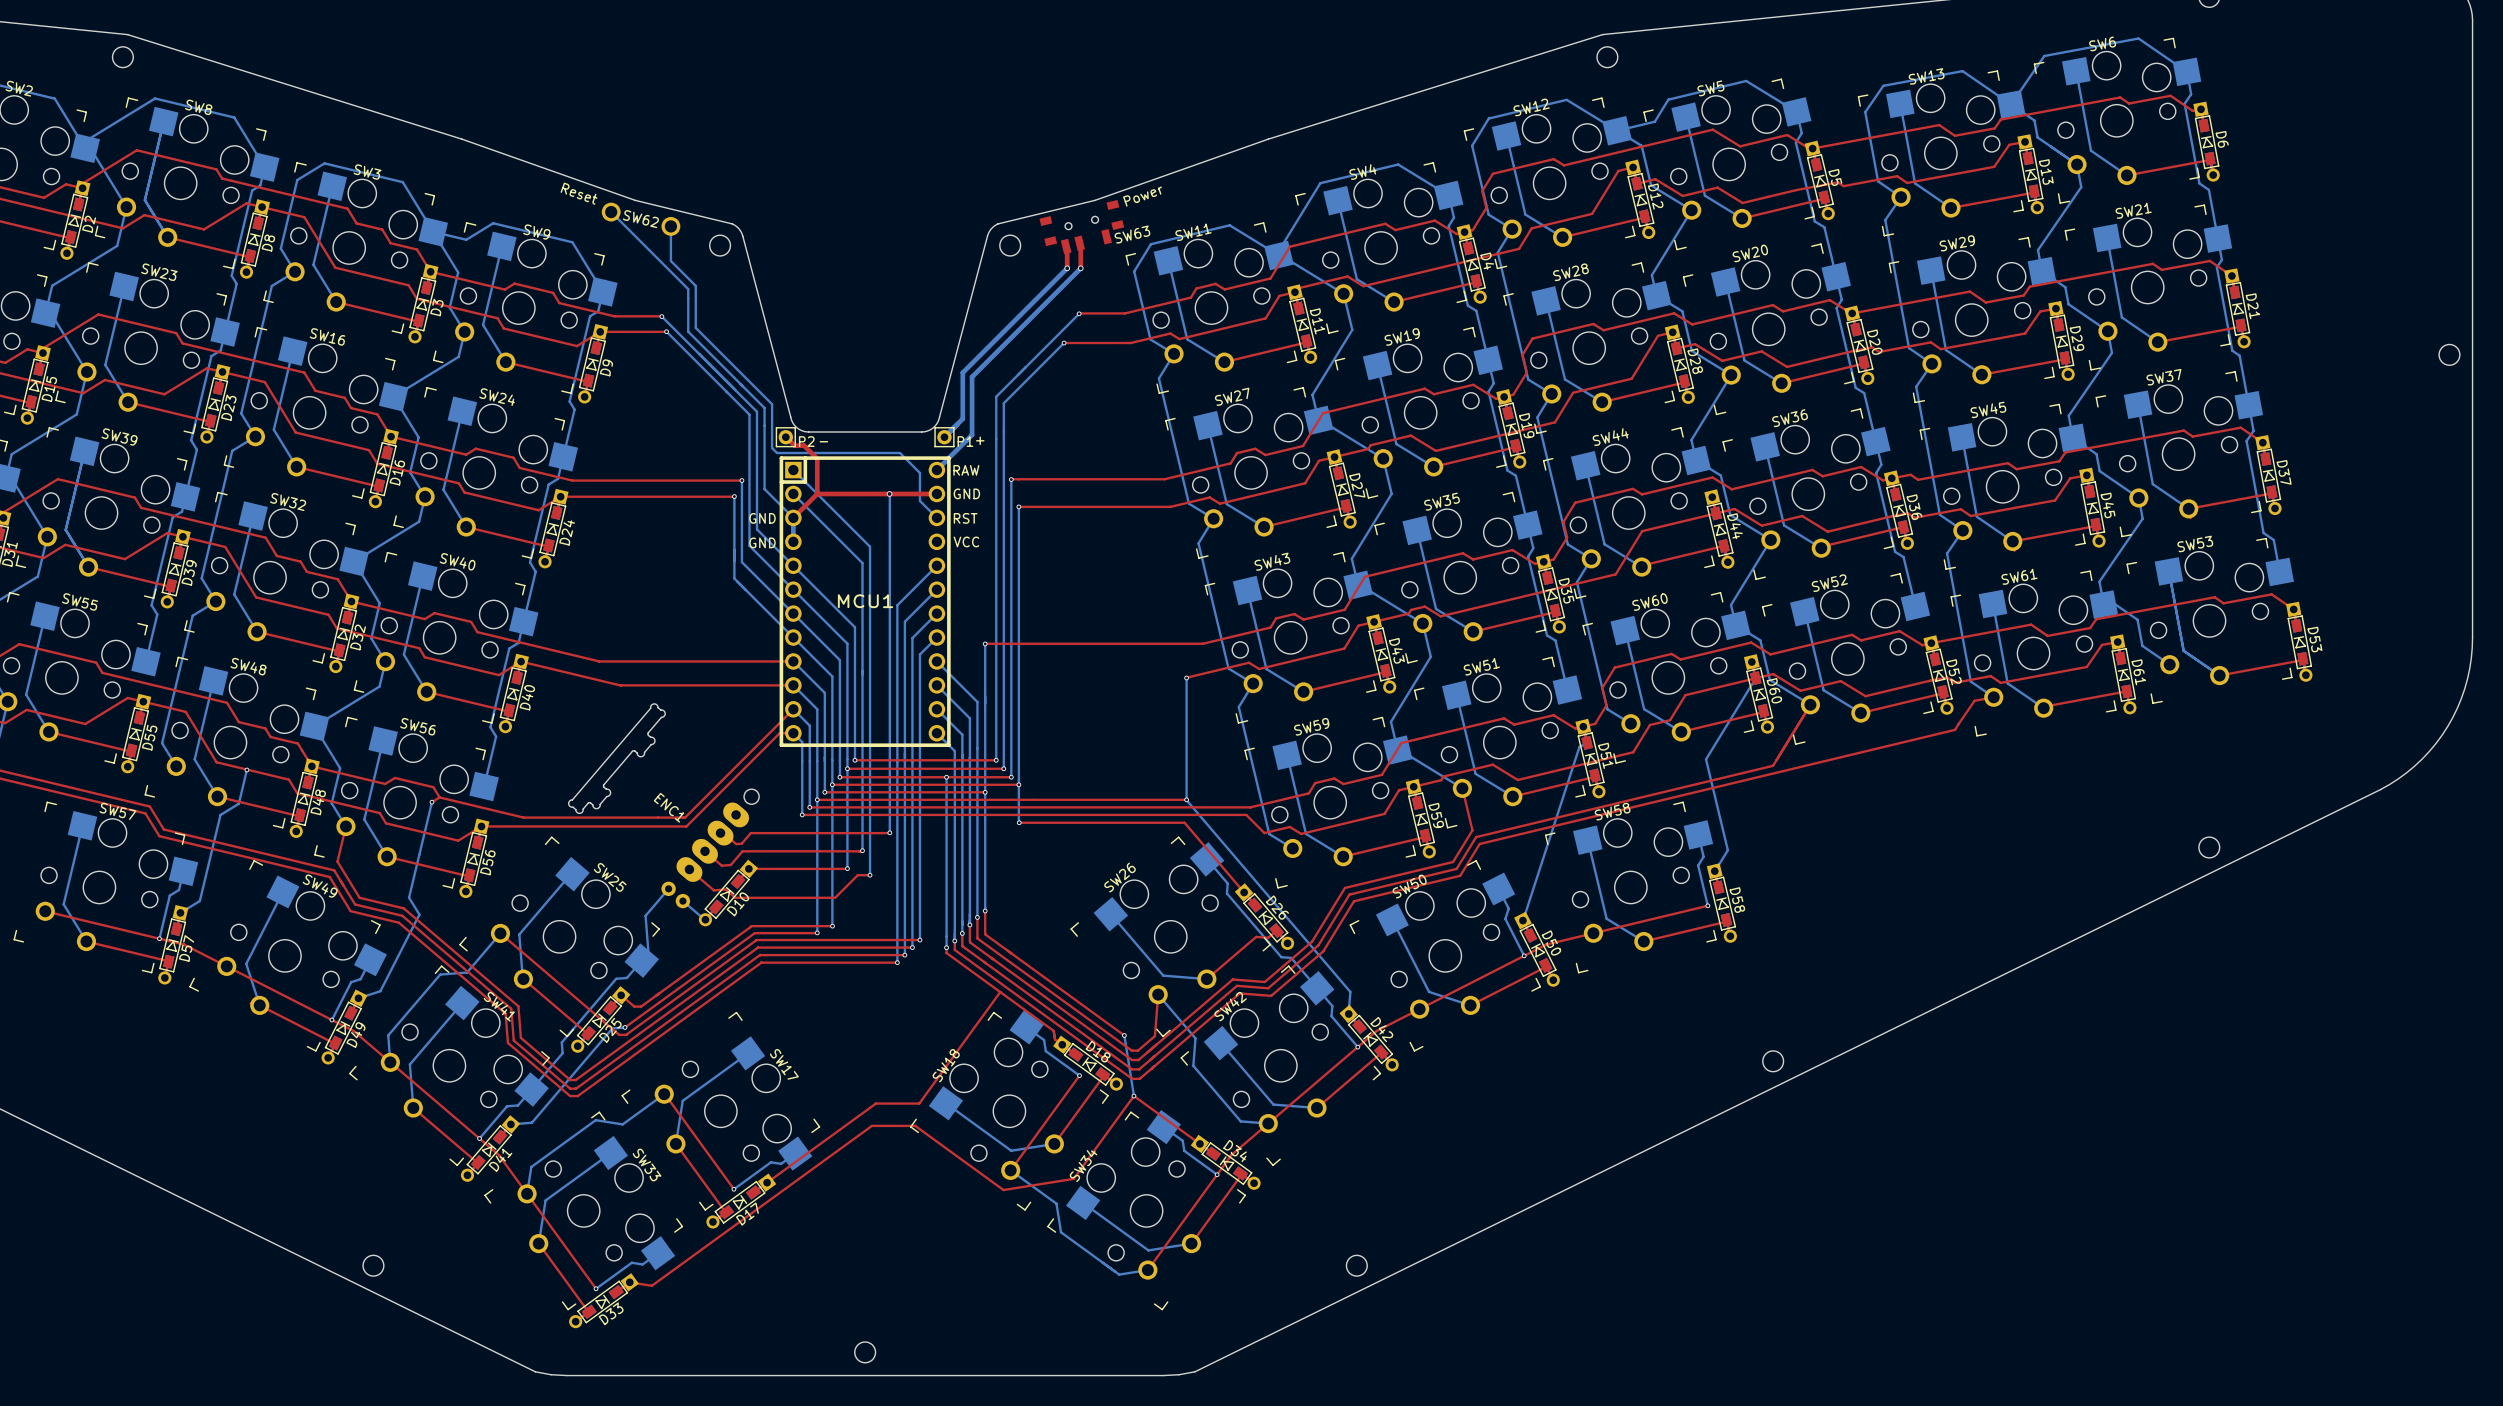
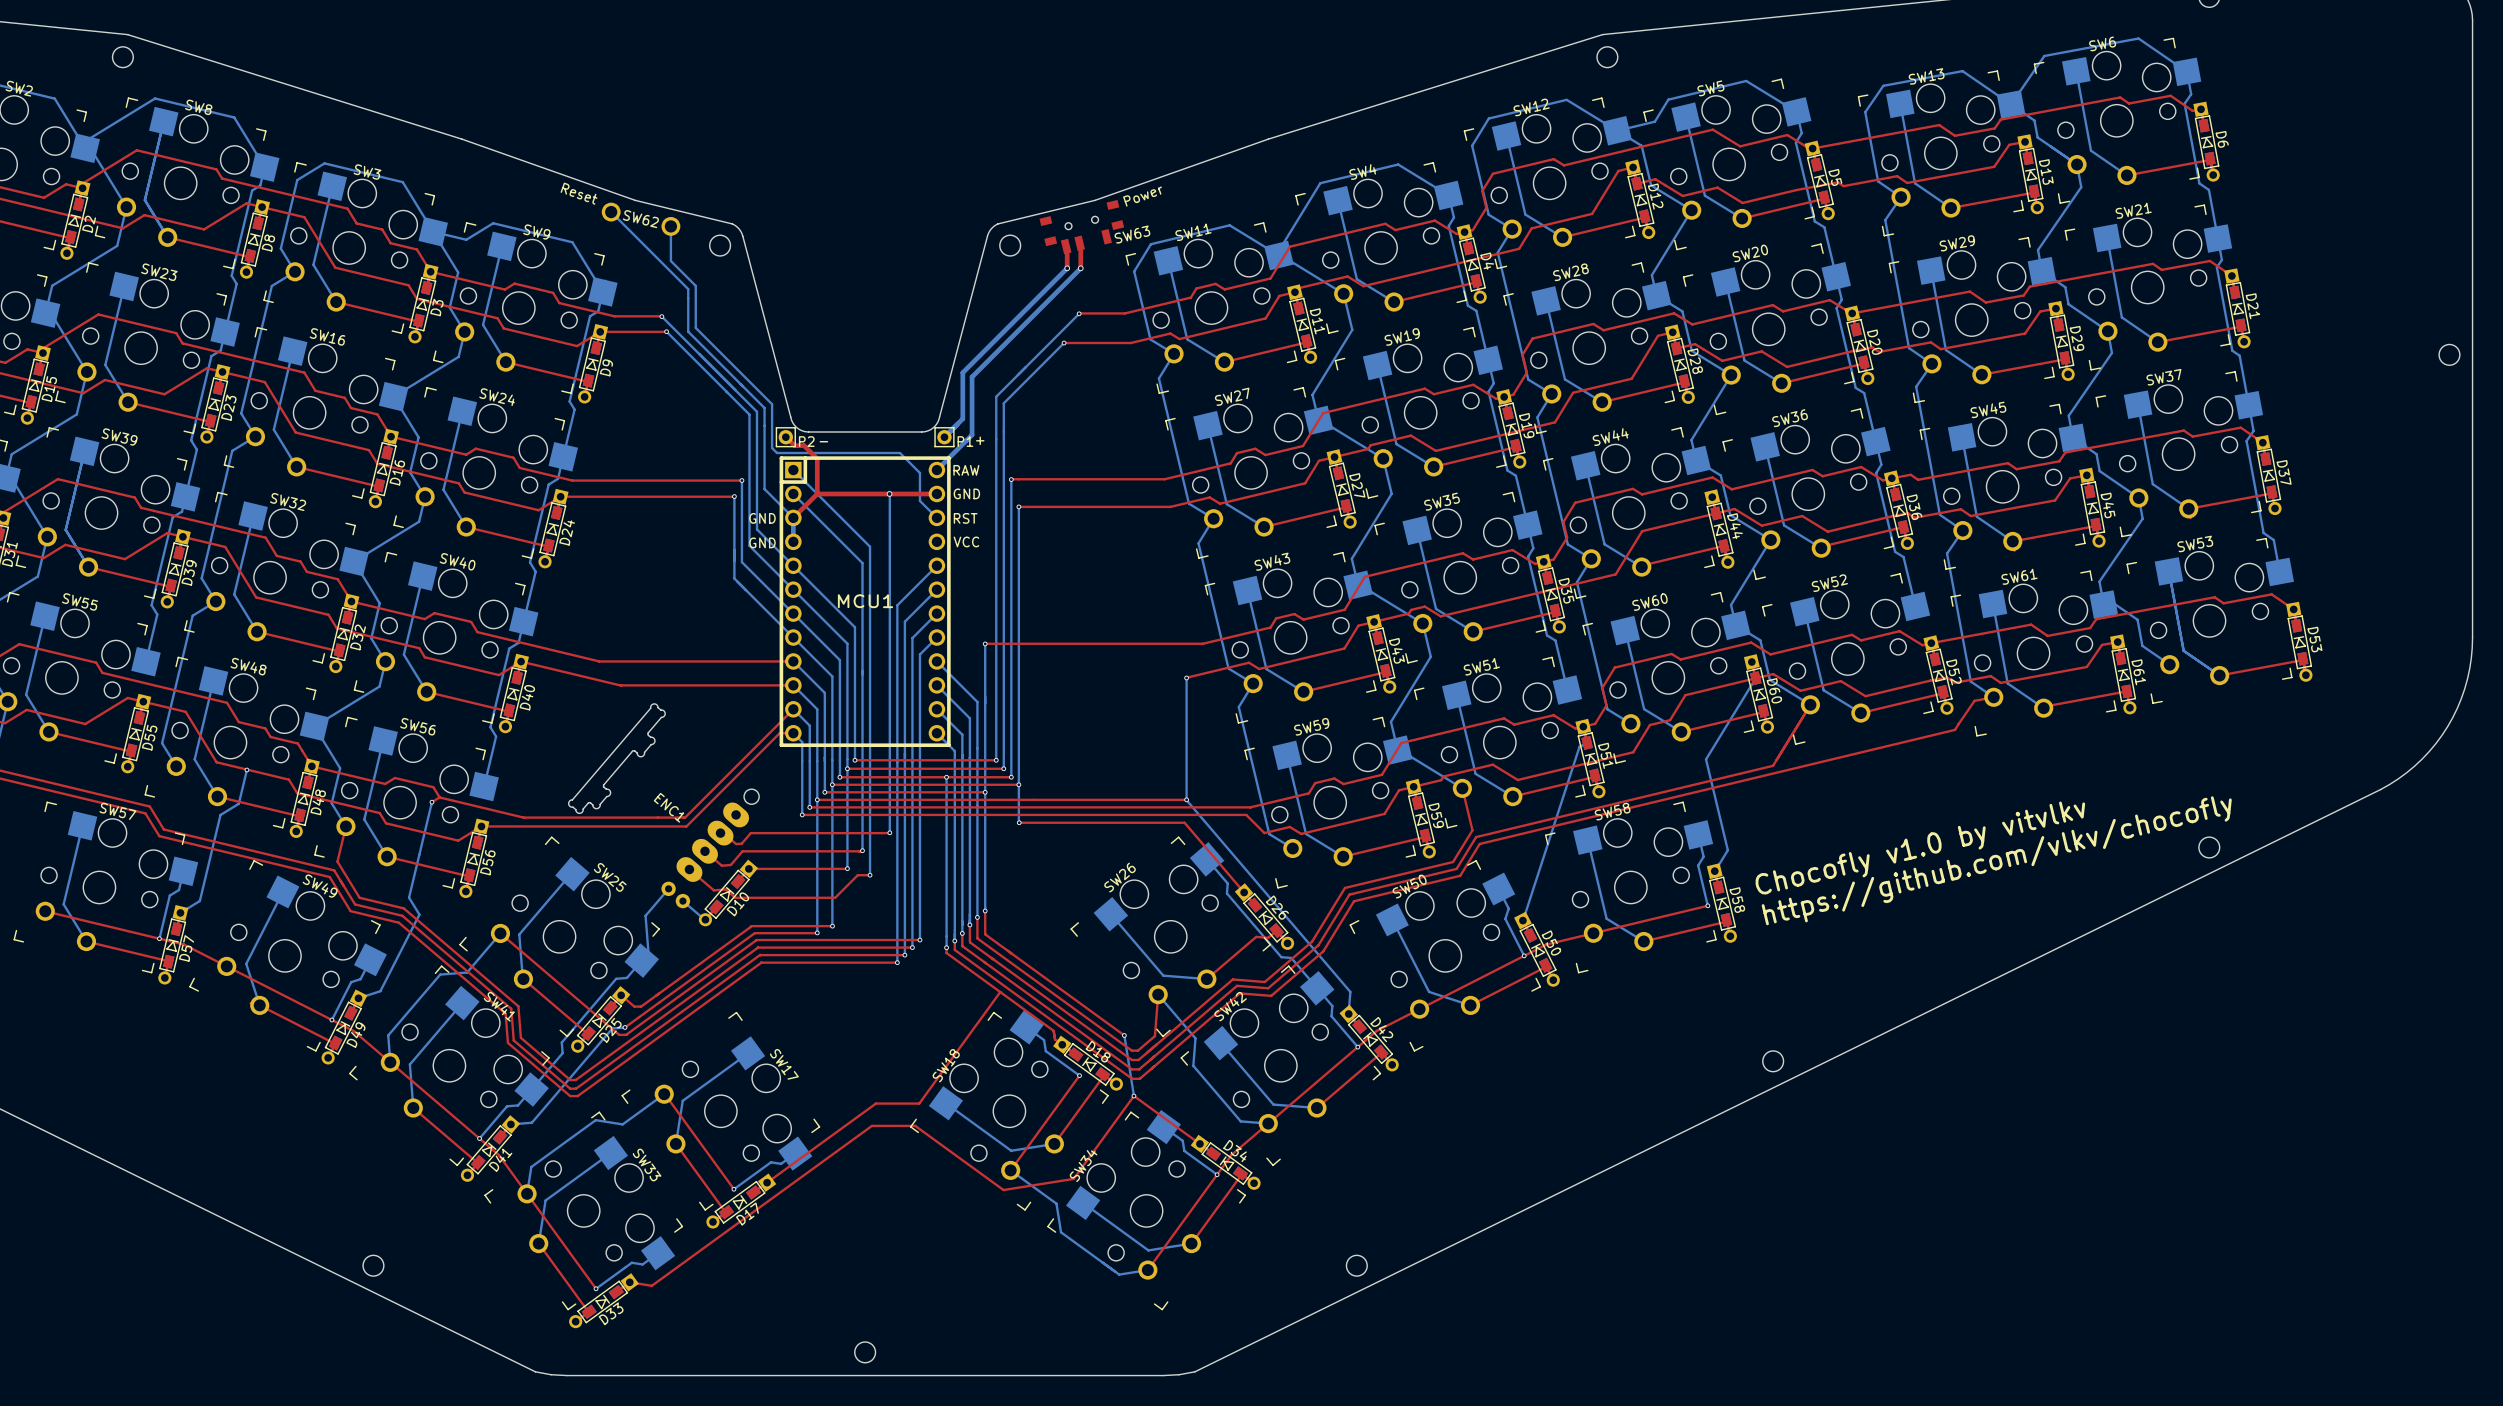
text: none -> Chocofly v1.0 by vitvlkv (1920, 848)
text: none -> https://github.com/vlkv/chocofly (1996, 860)

